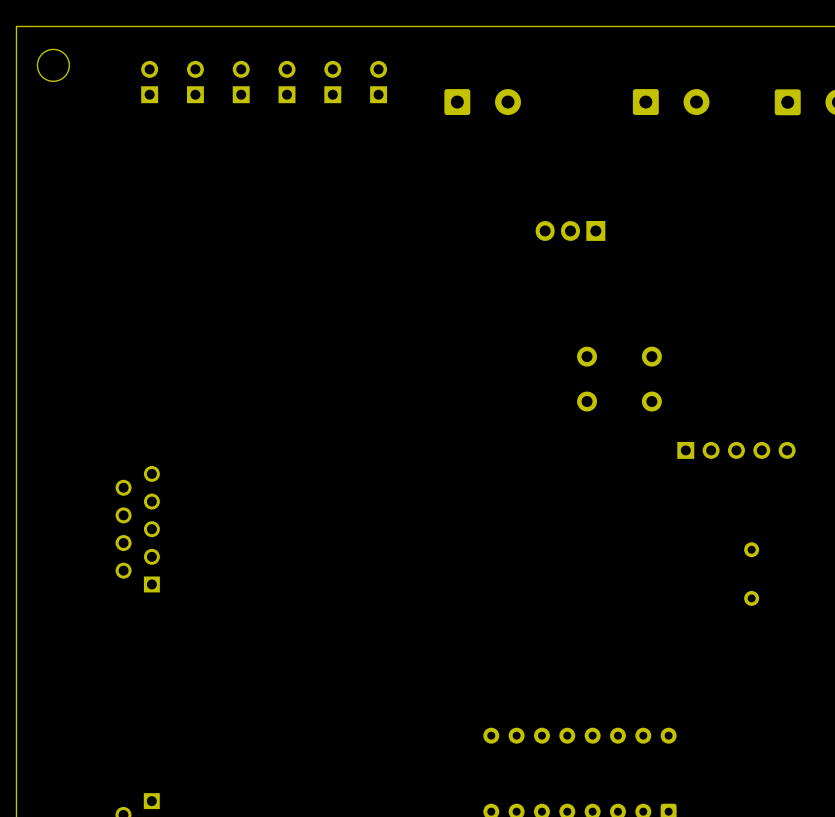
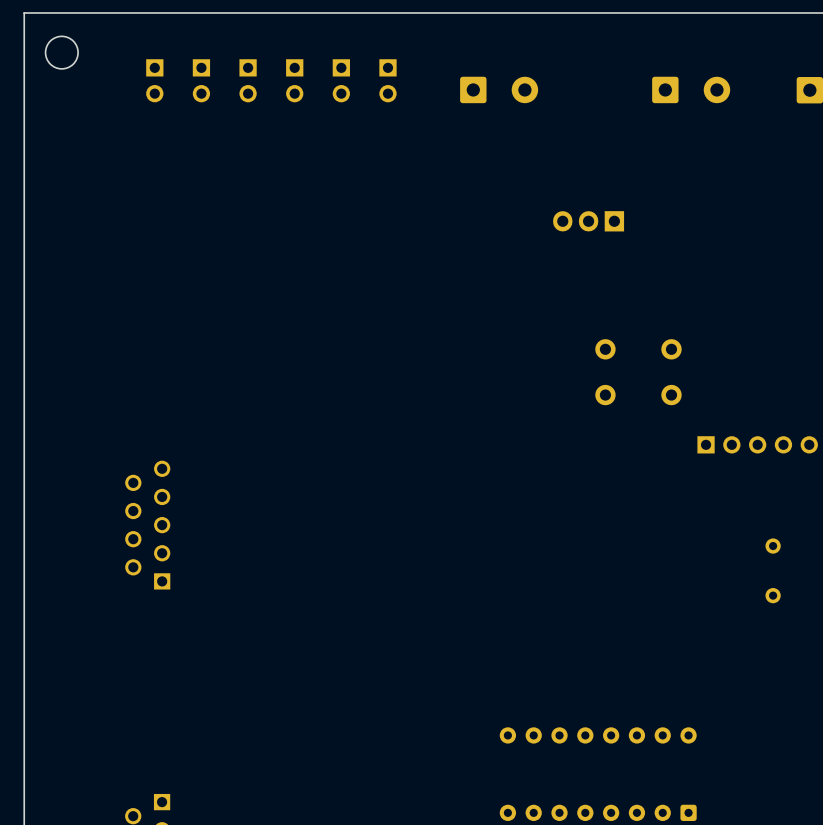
part rotation: 0° (149, 82) -> 180° (154, 80)
part rotation: 0° (195, 82) -> 180° (201, 80)
part rotation: 0° (241, 82) -> 180° (248, 80)
part rotation: 0° (287, 82) -> 180° (294, 80)
part rotation: 0° (332, 82) -> 180° (341, 80)
part rotation: 0° (378, 82) -> 180° (388, 80)

